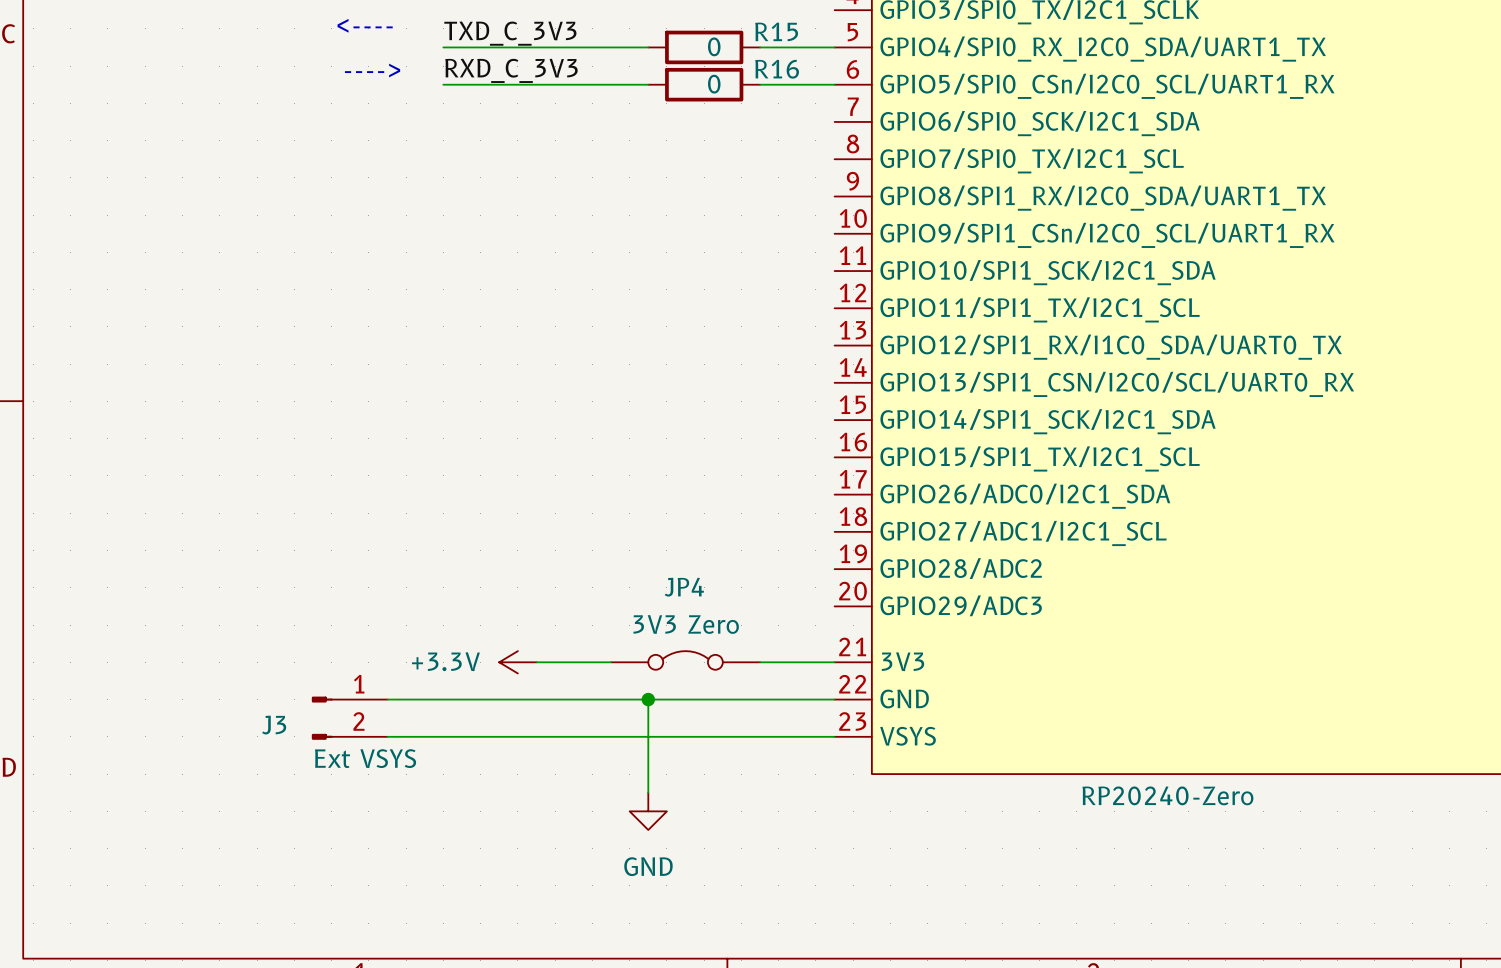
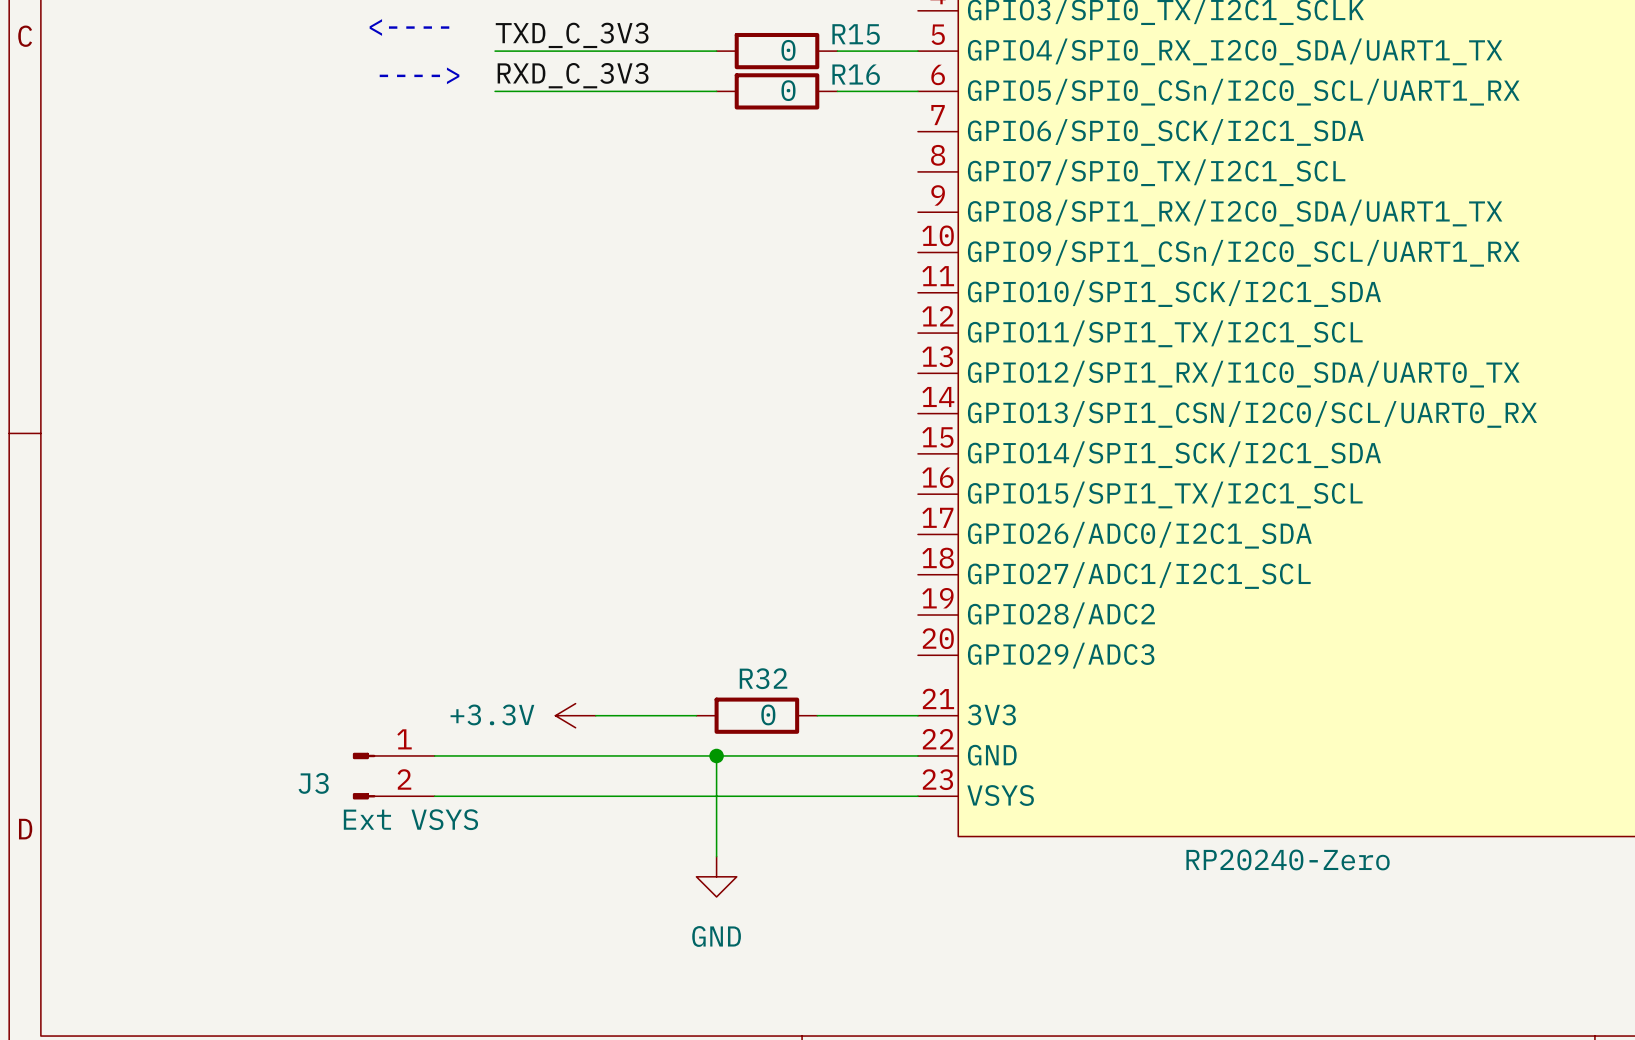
JP4: 3V3 Zero (685, 660) -> none
R32: none -> 0 (756, 715)

